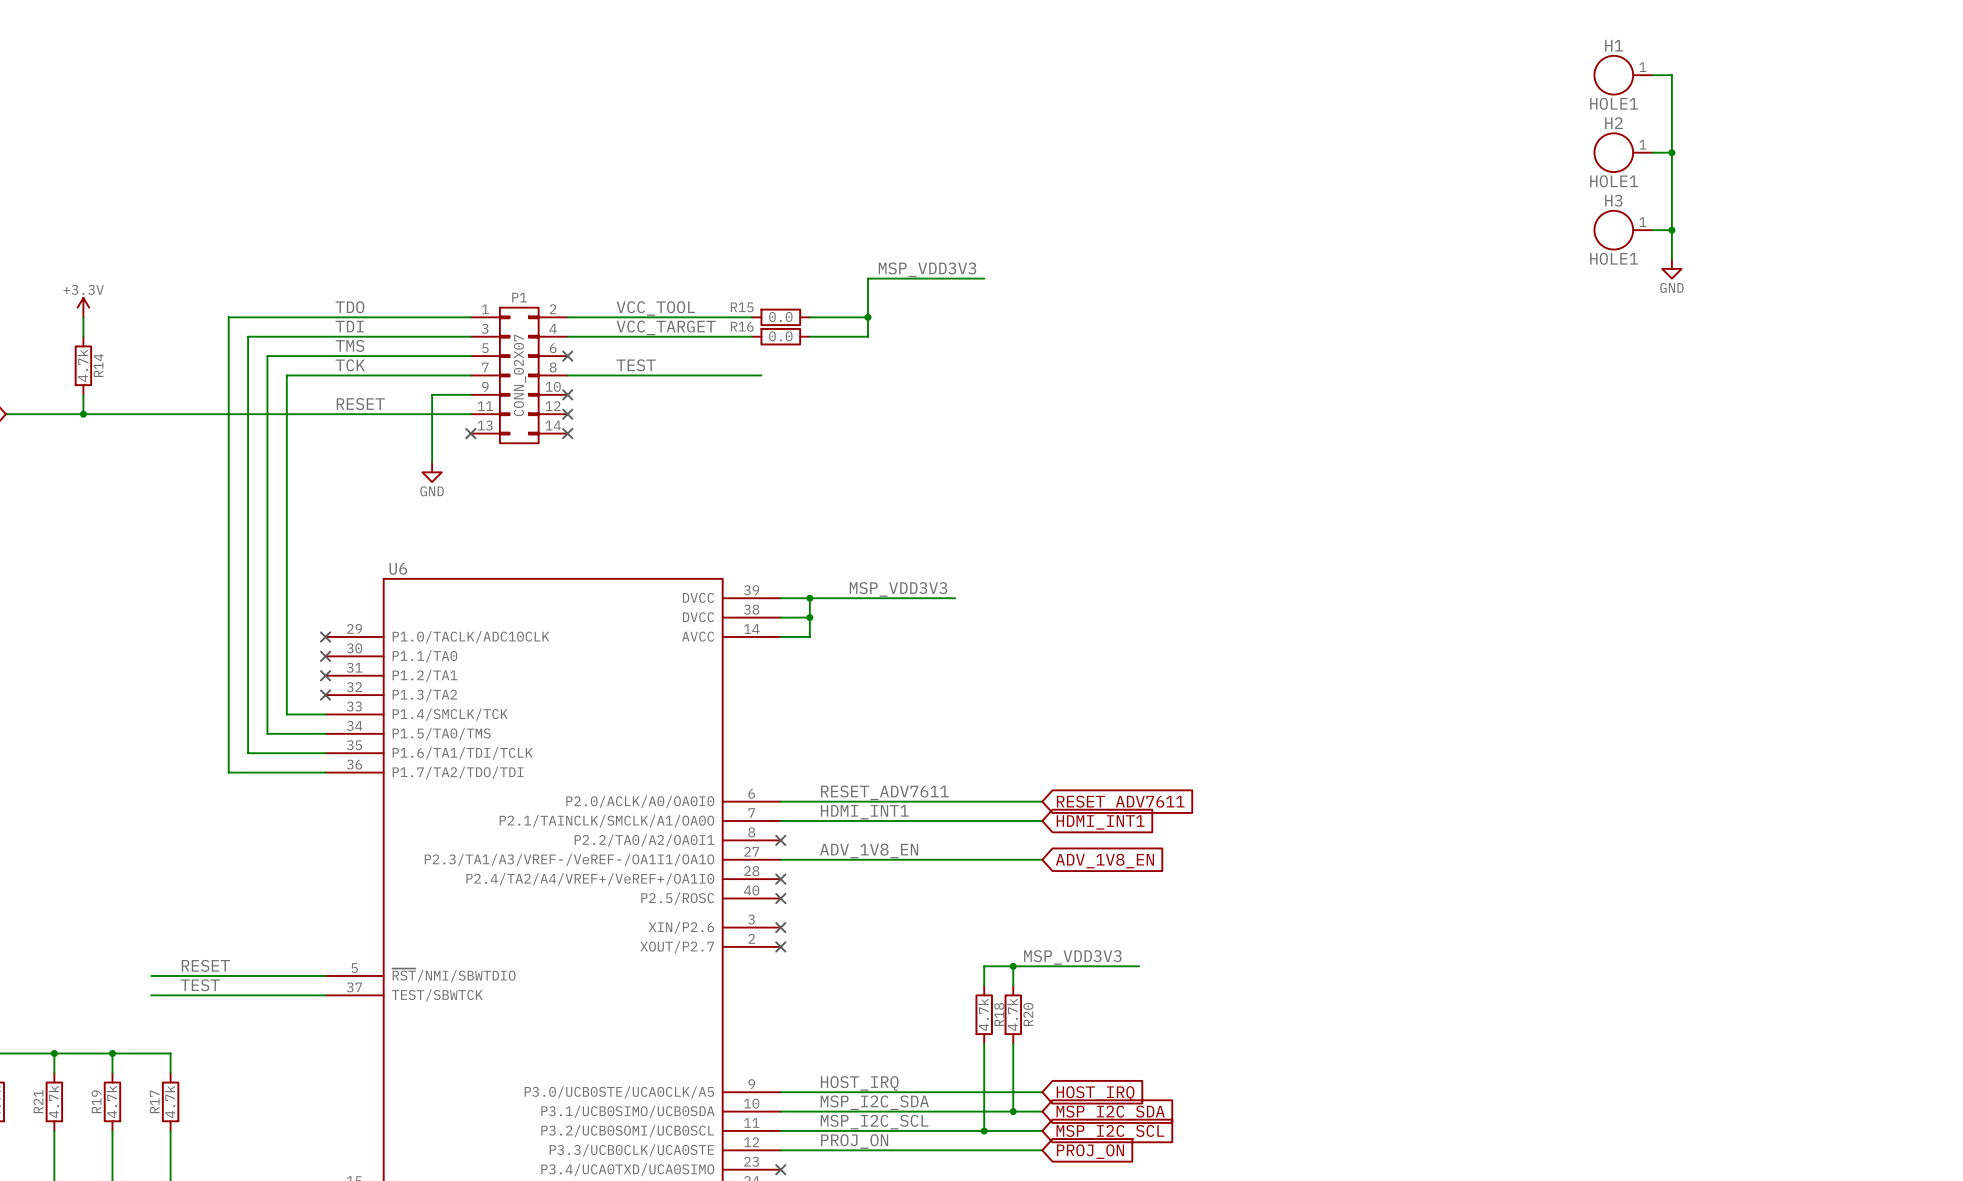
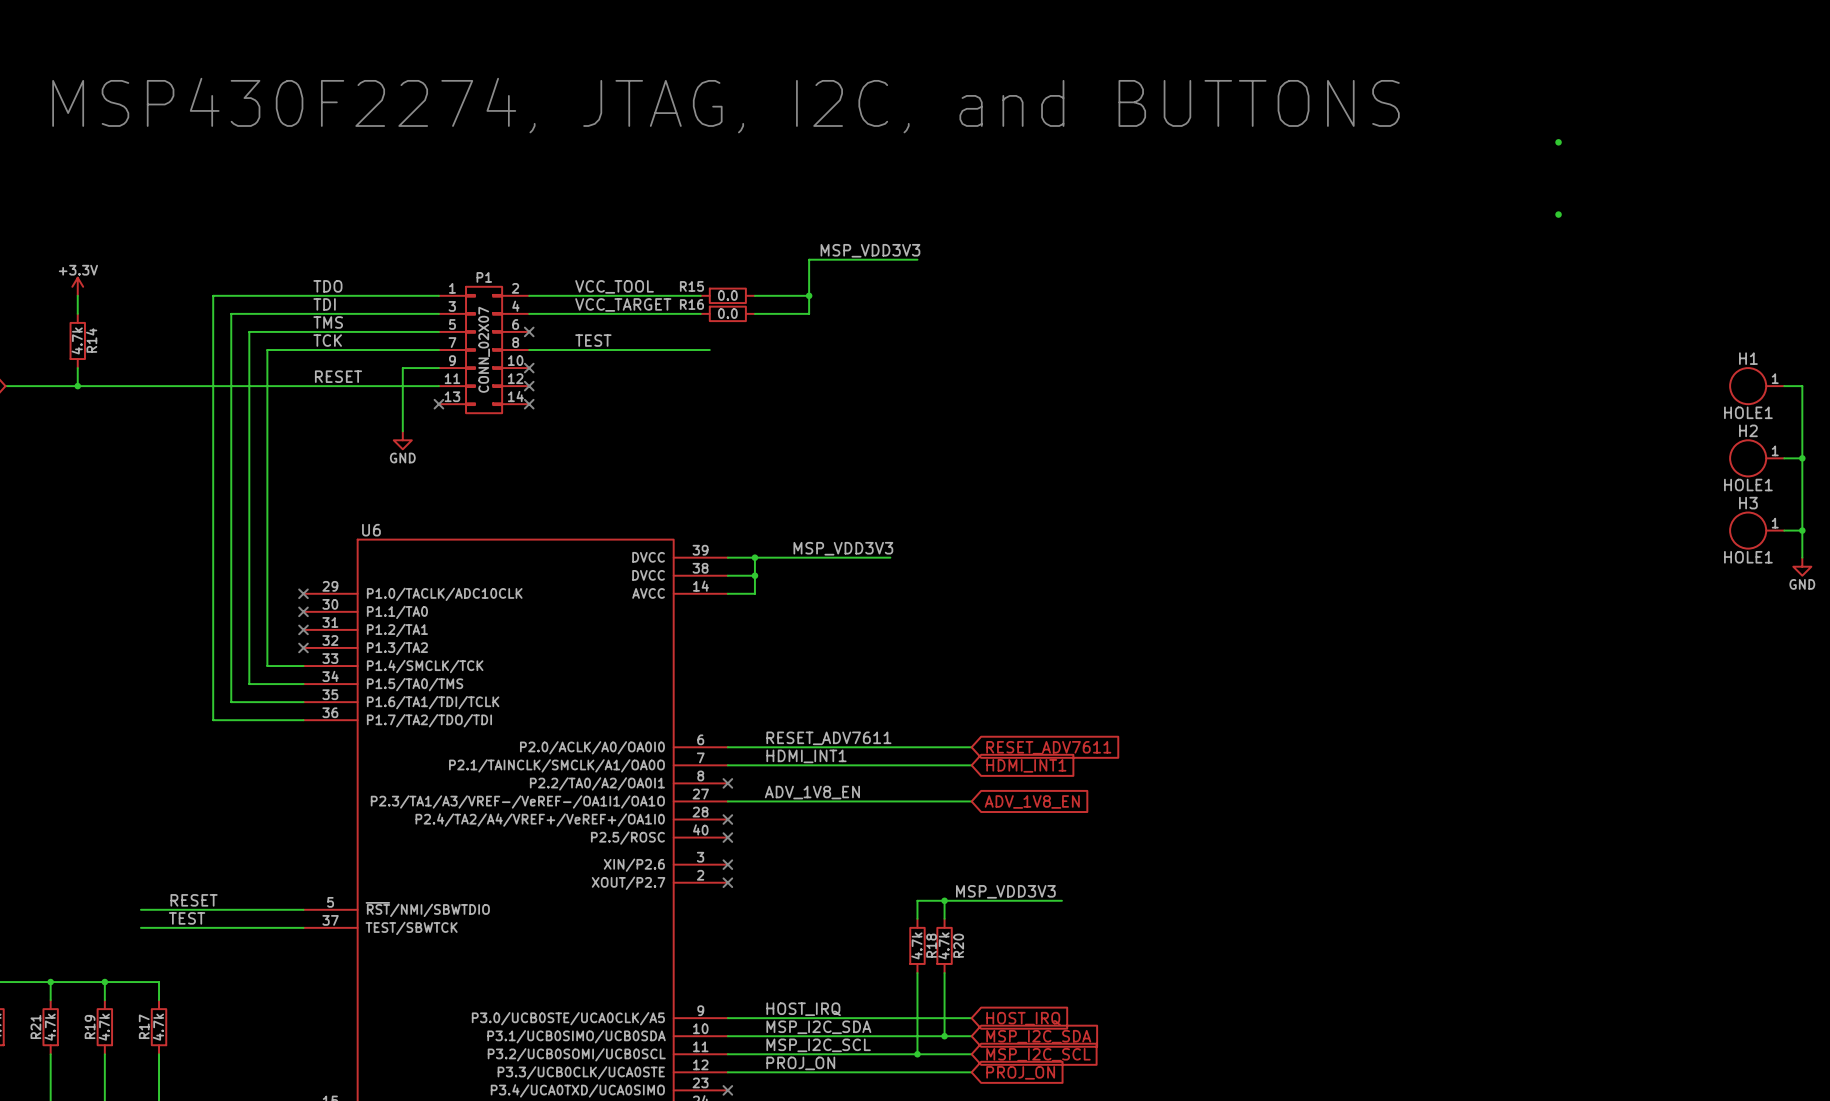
H1 position: (1623, 75) -> (1757, 386)
wire: (1652, 75) (1671, 75) (1671, 259) -> none
text: none -> MSP430F2274, JTAG, I2C, and BUTTONS (725, 105)
H2 position: (1623, 152) -> (1757, 458)
wire: (1652, 152) (1671, 152) -> none
H3 position: (1623, 230) -> (1757, 530)
wire: (1652, 230) (1671, 230) -> none
power symbol: GND (1671, 268) -> none
wire: none -> (1784, 386) (1802, 386) (1802, 557)
wire: none -> (1784, 458) (1802, 458)
junction: none -> (1802, 458)
wire: none -> (1784, 530) (1802, 530)
junction: none -> (1802, 530)
power symbol: none -> GND (1802, 566)

